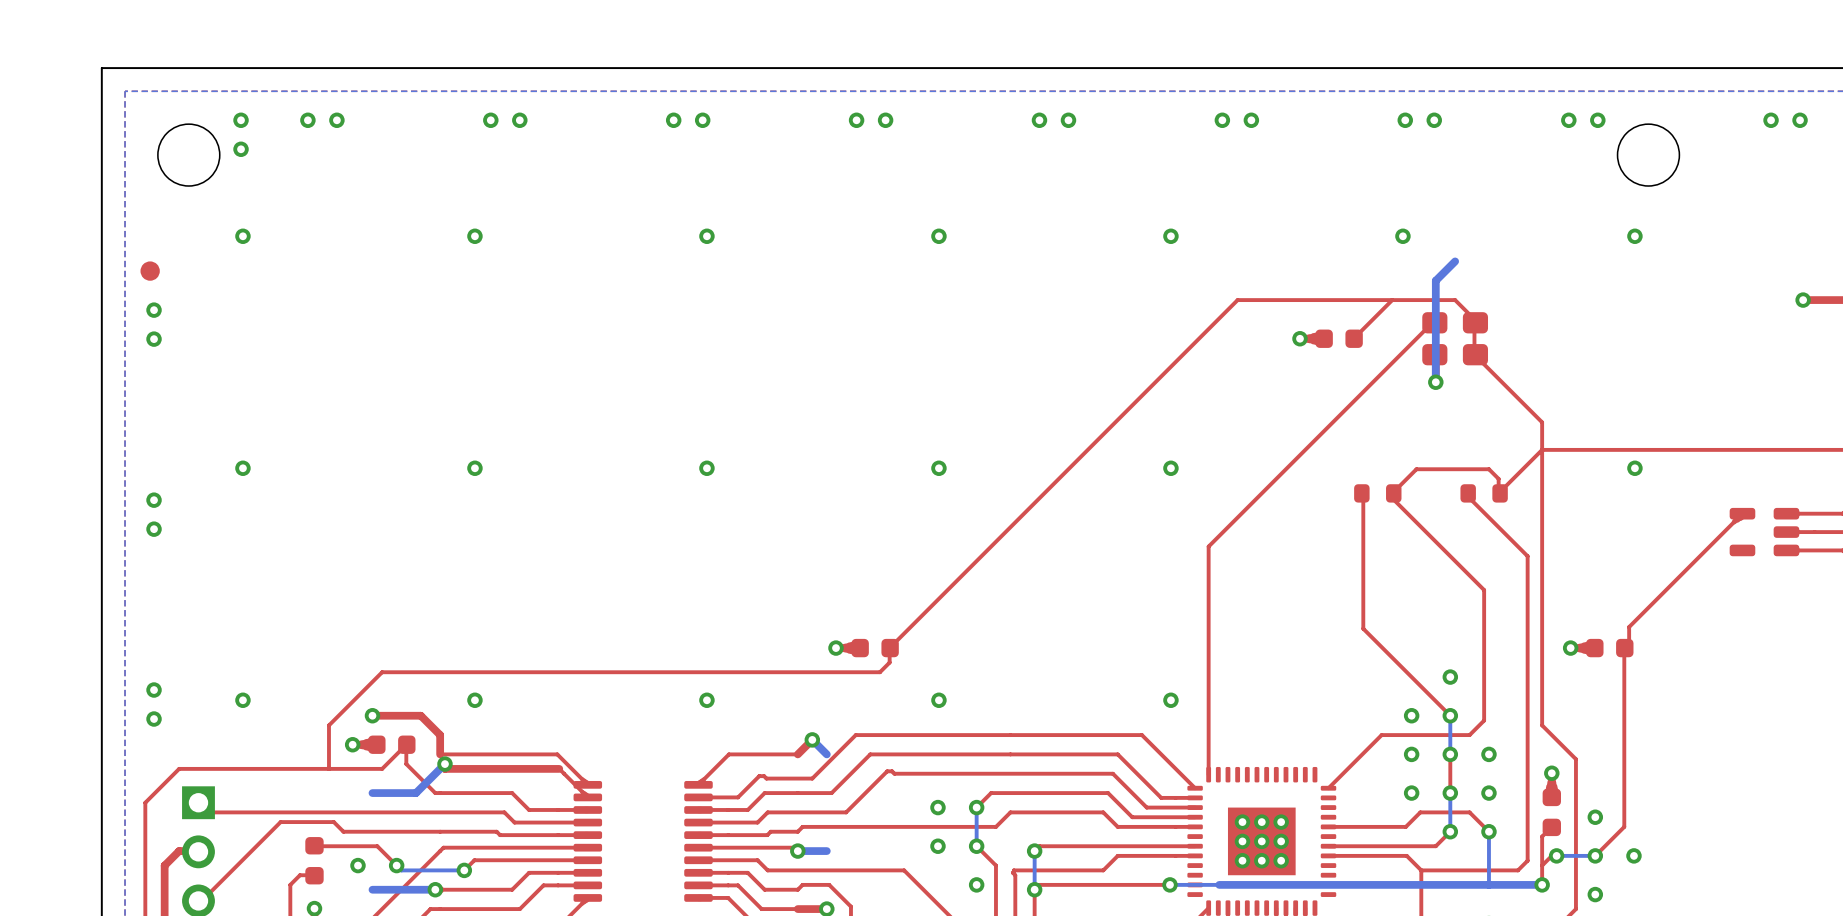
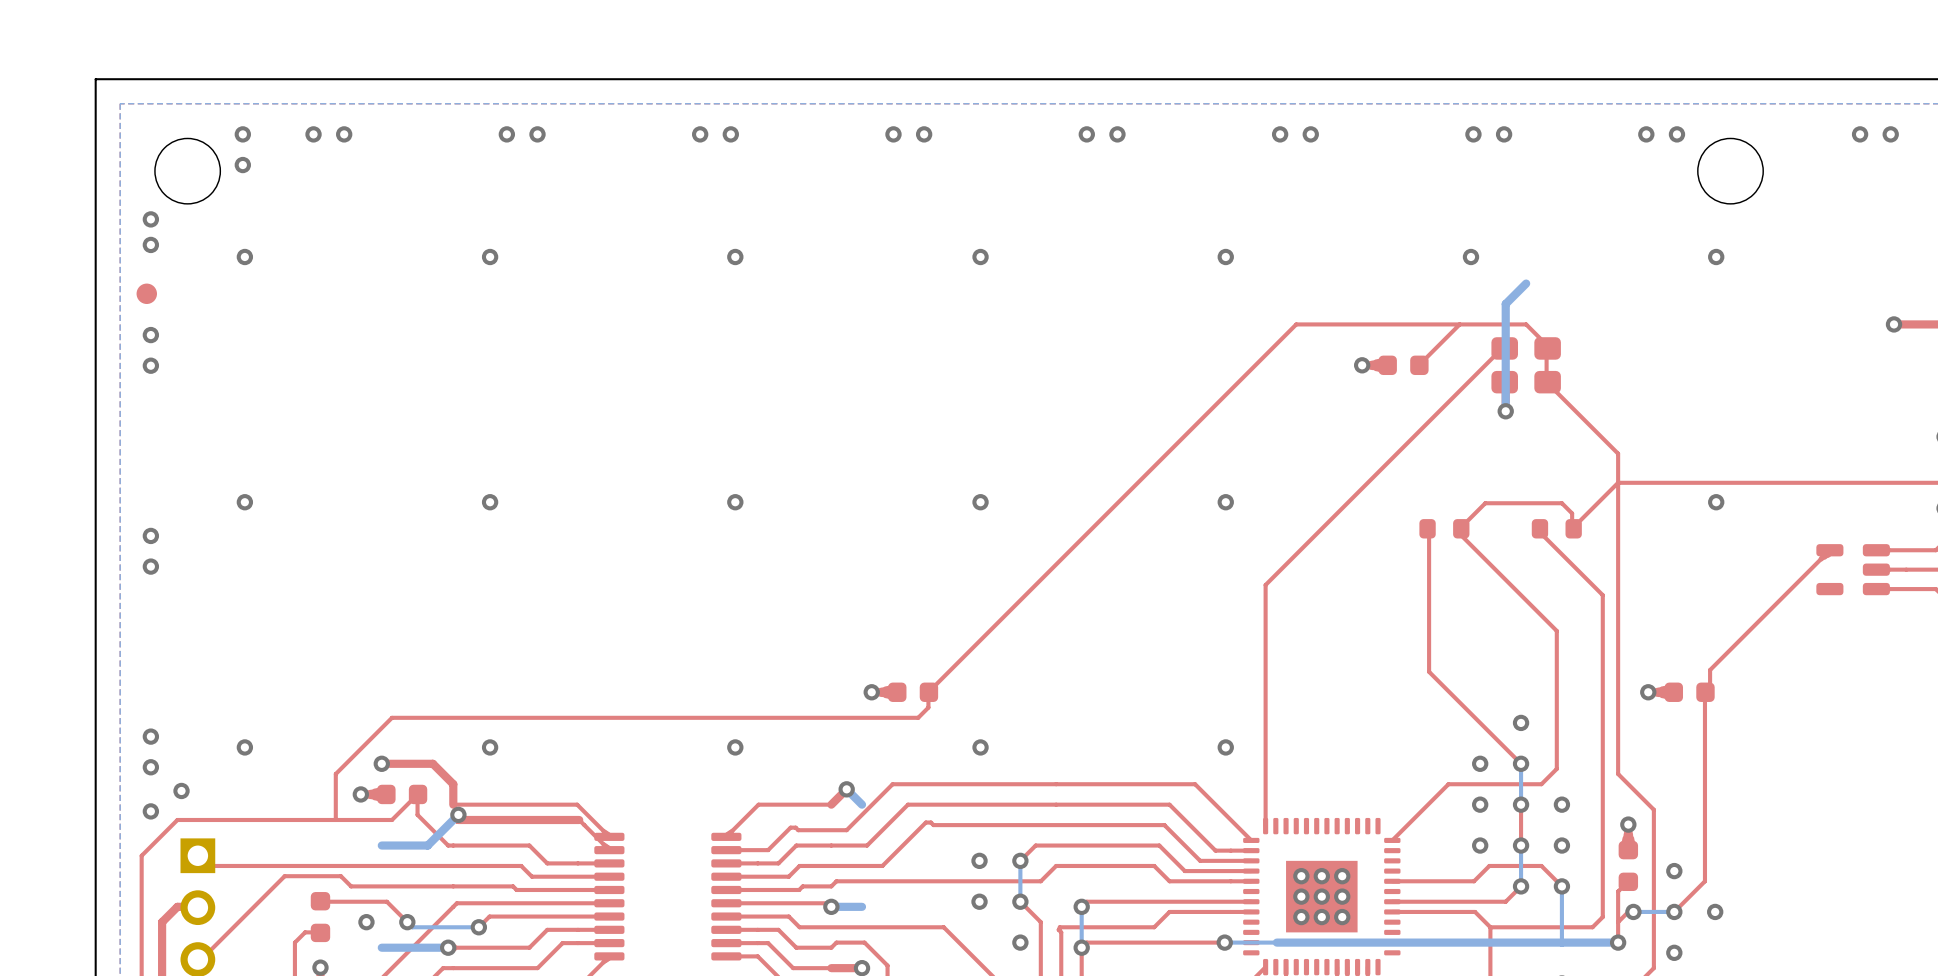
via: none -> (150, 219)
via: none -> (150, 244)
via: none -> (181, 790)
via: none -> (150, 811)

